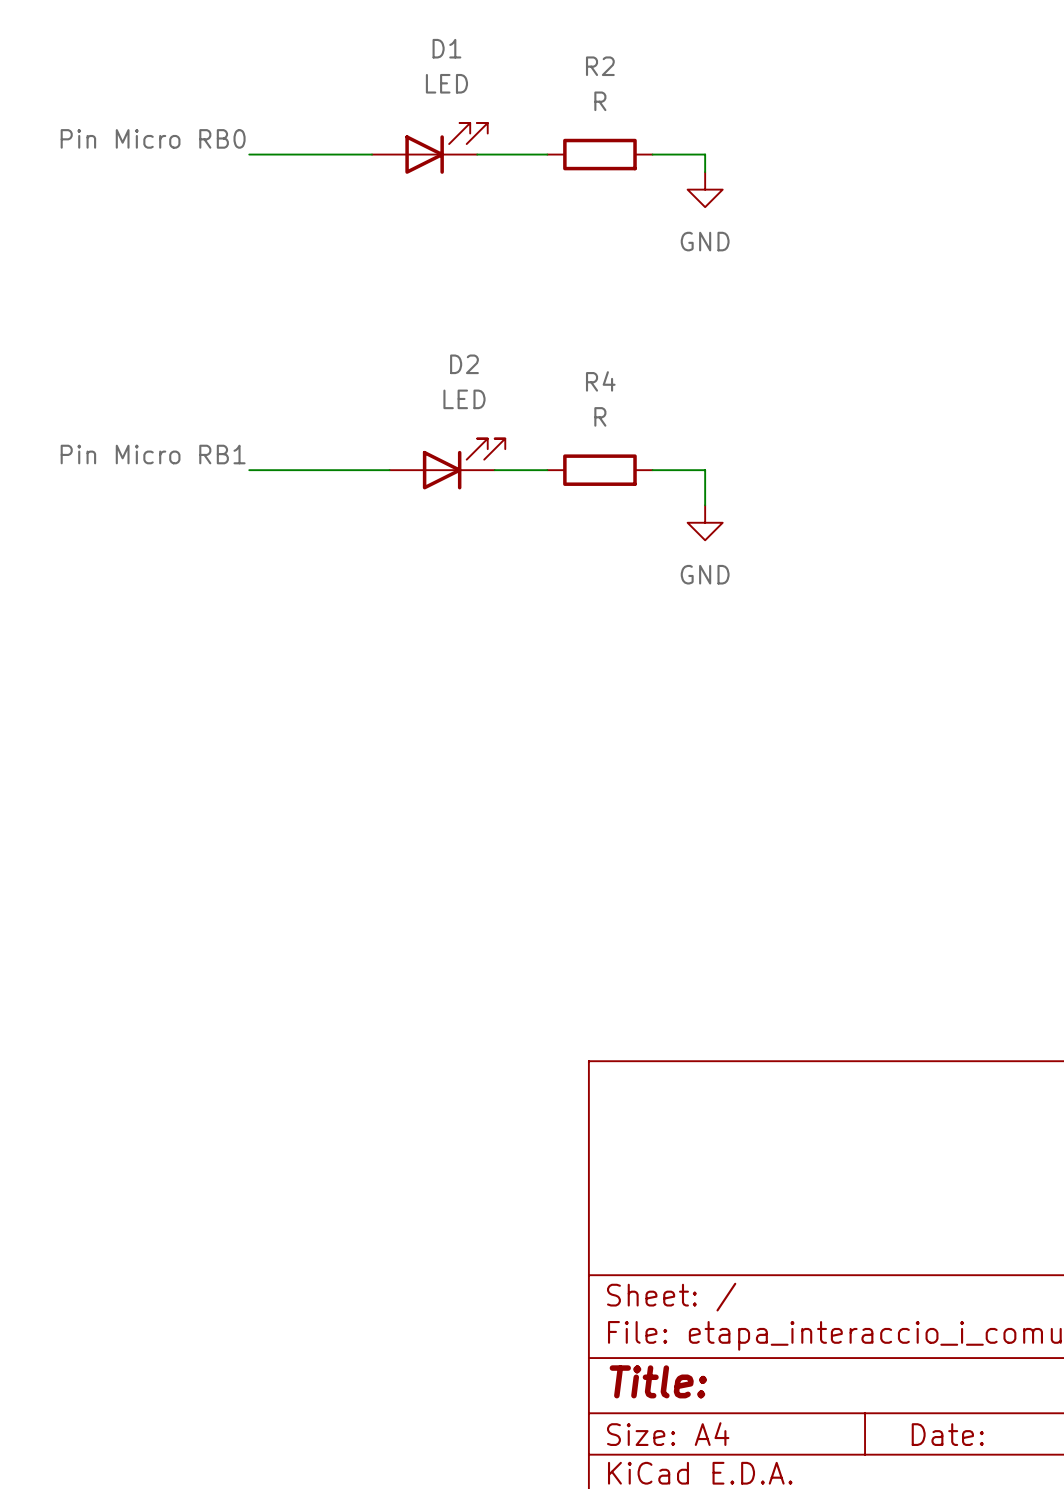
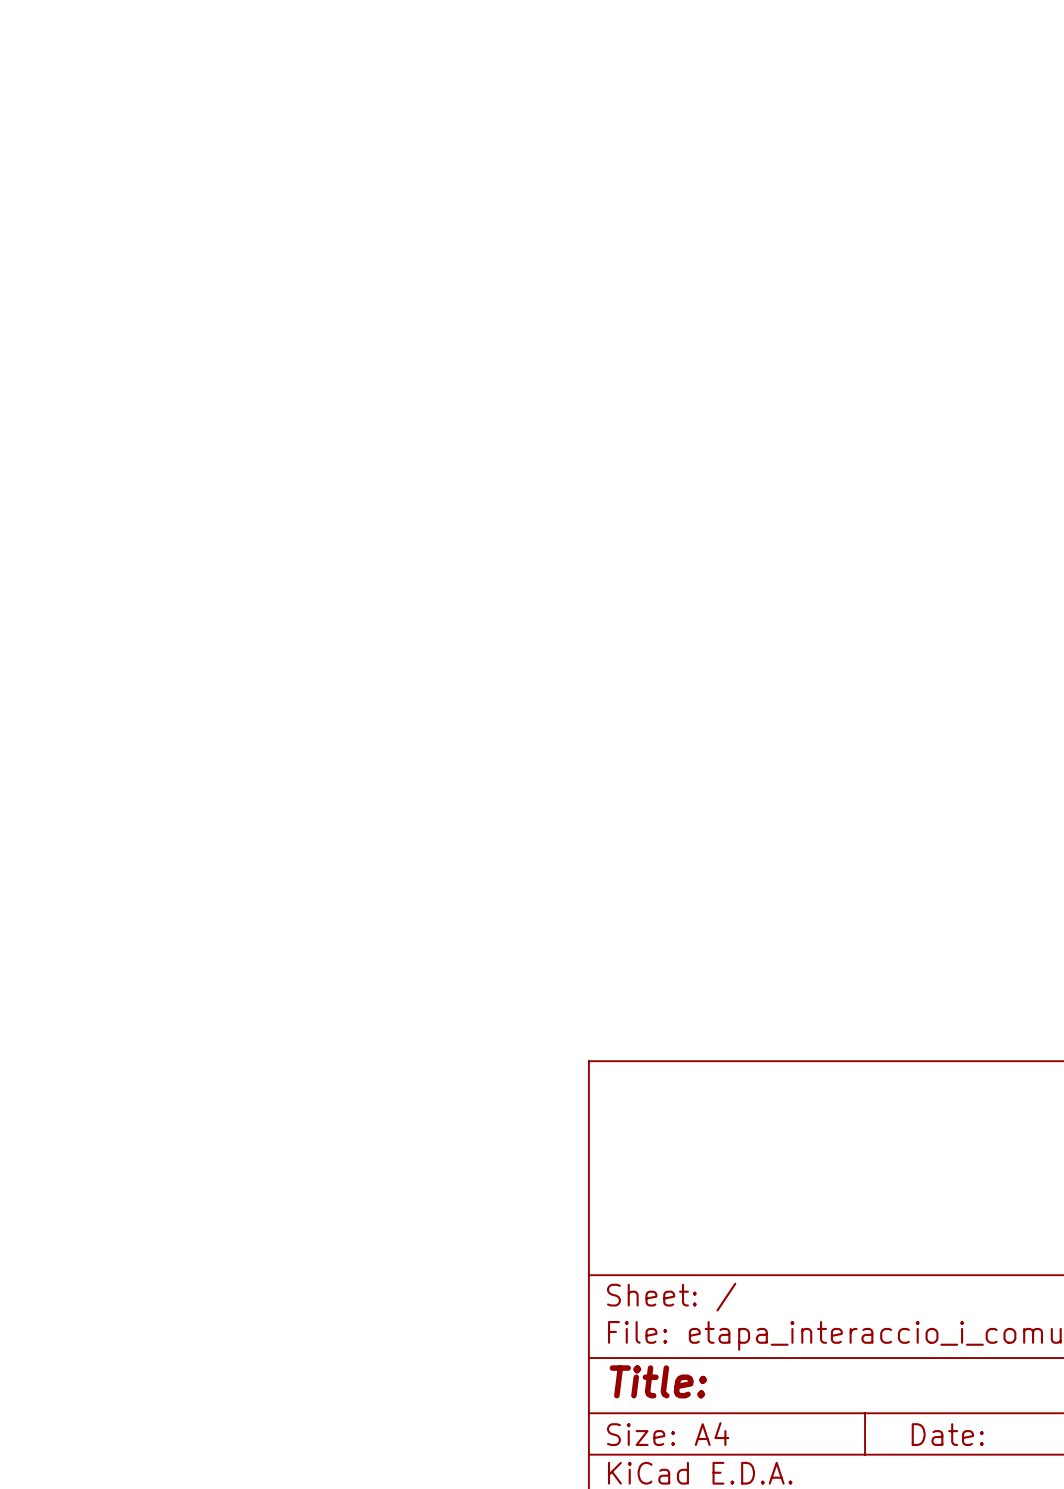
label: Pin Micro RB0 (153, 138) -> none
D1: LED (429, 148) -> none
wire: (249, 154) (372, 154) -> none
wire: (477, 154) (547, 154) -> none
R2: R (599, 154) -> none
wire: (652, 154) (705, 154) (705, 172) -> none
power symbol: GND (705, 189) -> none
label: Pin Micro RB1 (153, 454) -> none
D2: LED (447, 464) -> none
wire: (249, 470) (389, 470) -> none
wire: (494, 470) (547, 470) -> none
R4: R (599, 470) -> none
wire: (652, 470) (705, 470) (705, 505) -> none
power symbol: GND (705, 522) -> none

